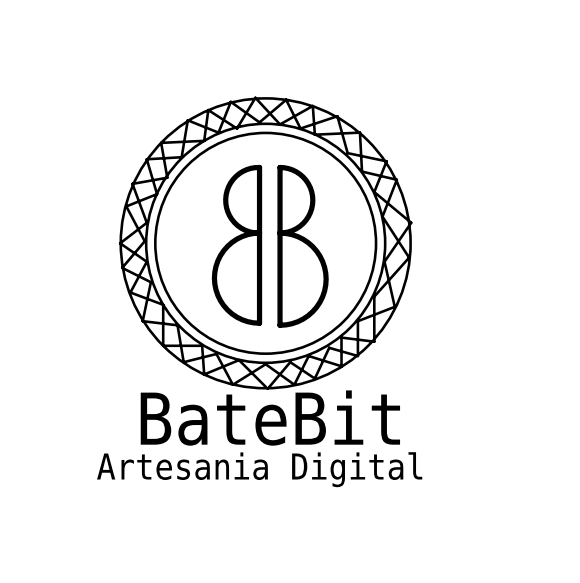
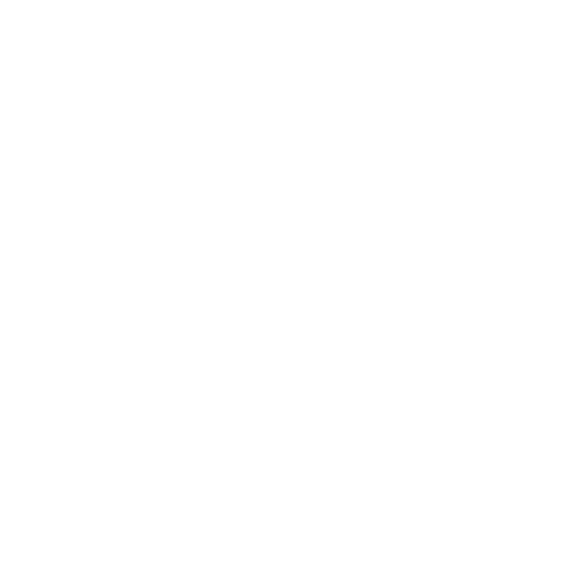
drawing: [118, 96, 413, 391] -> none

